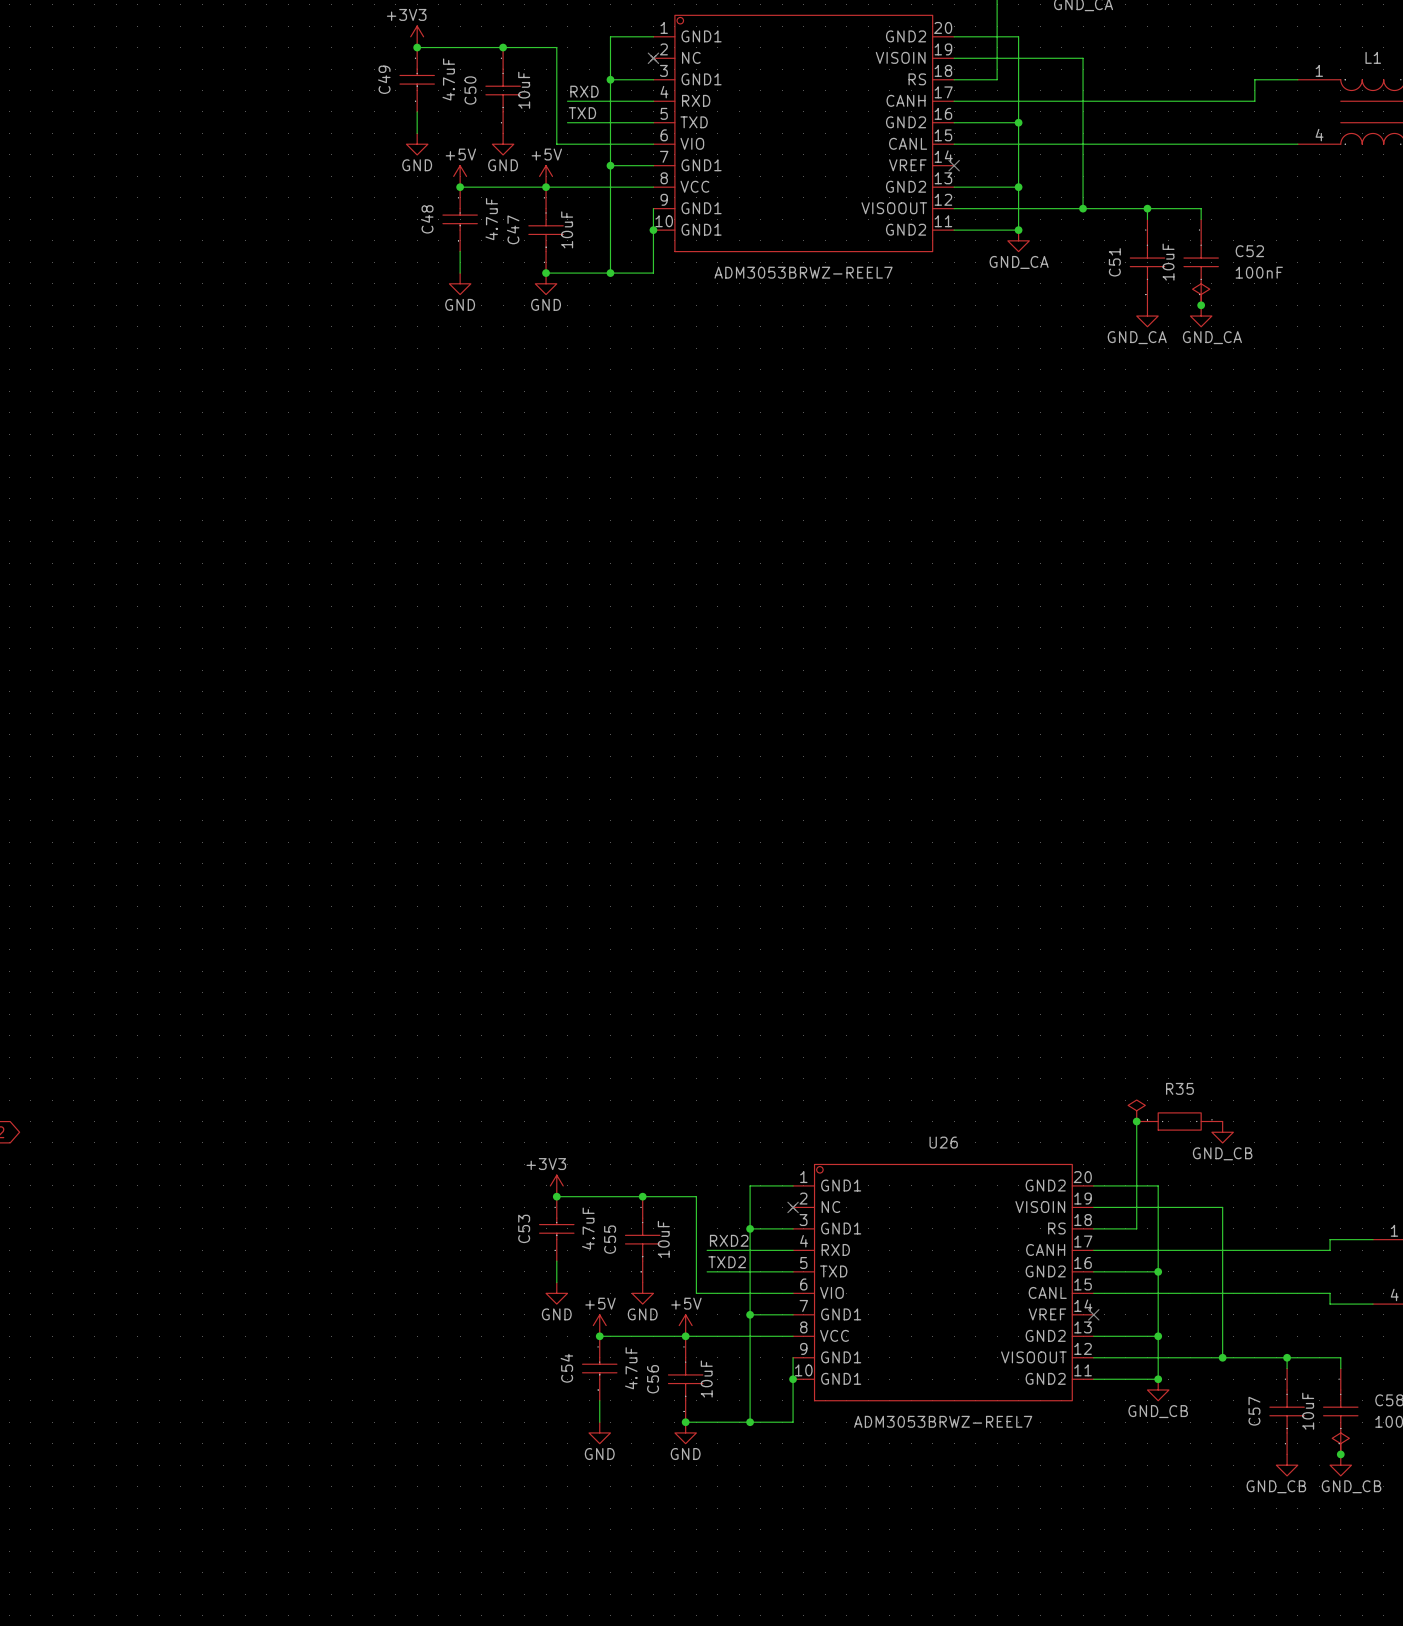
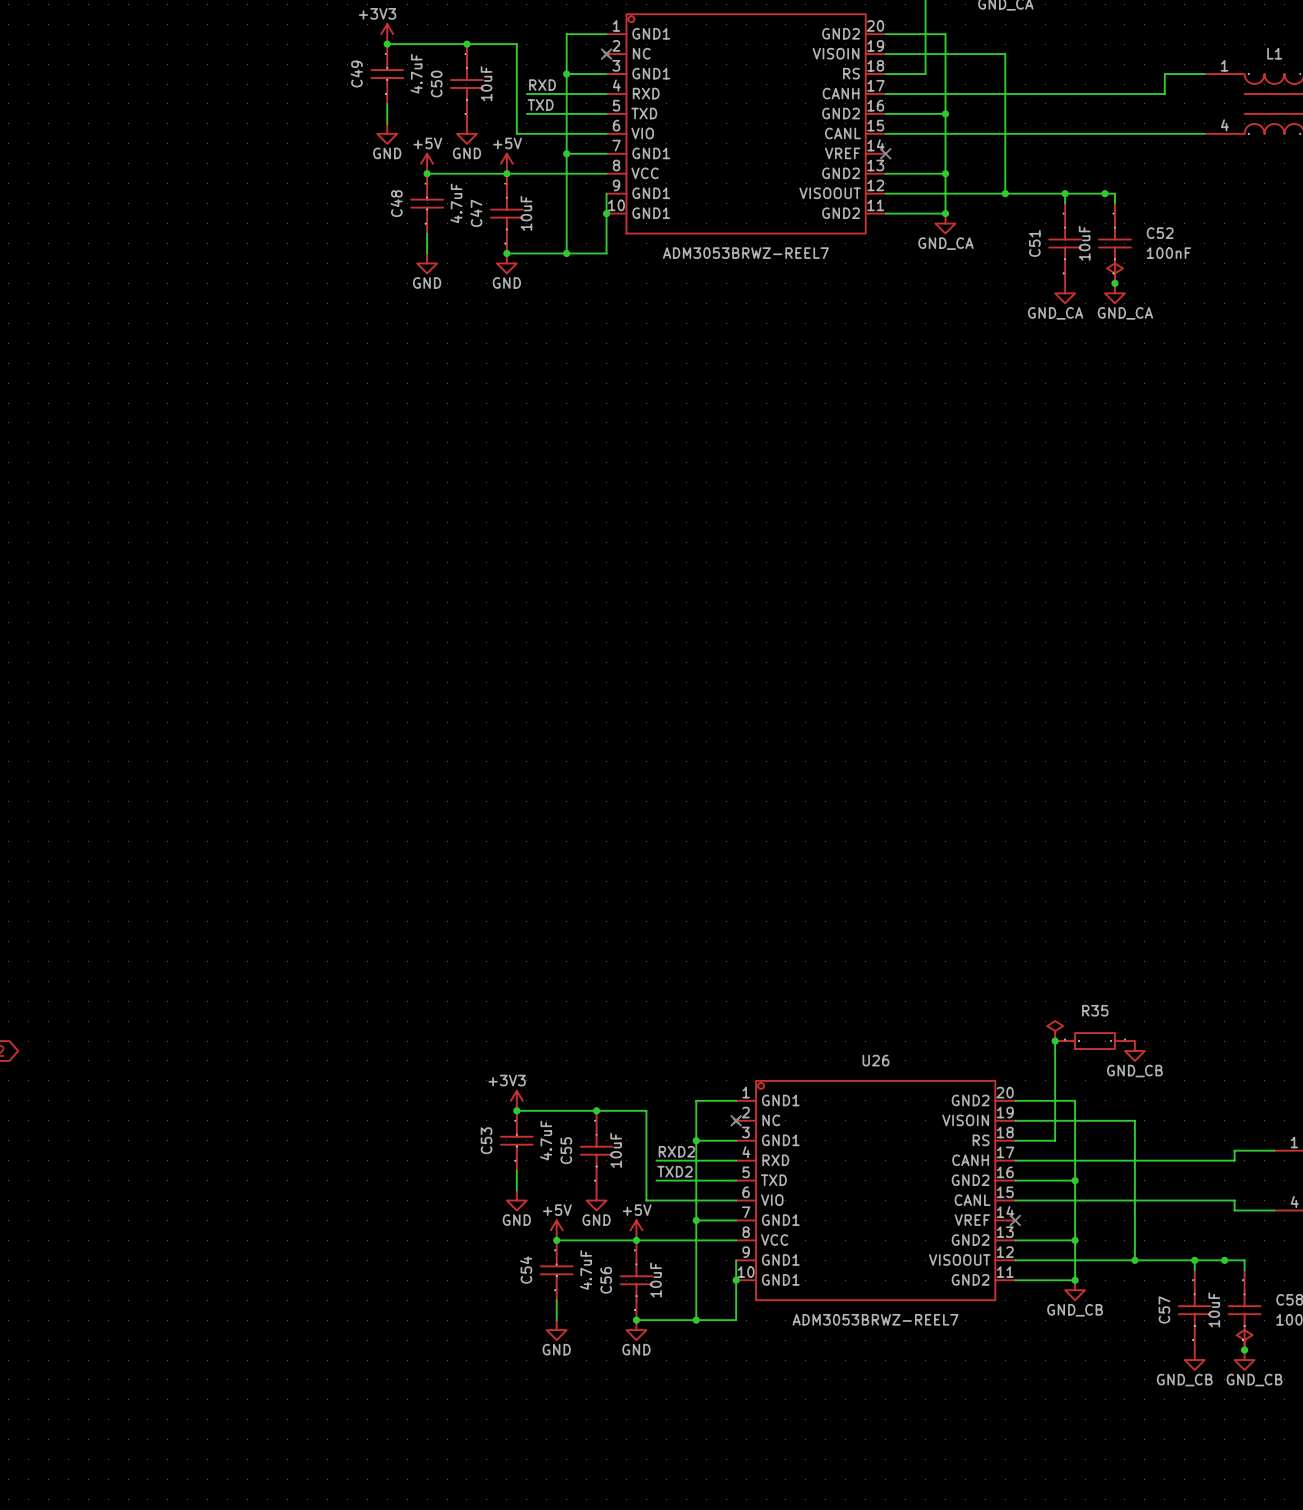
junction: none -> (1105, 193)
junction: none -> (1224, 1260)

